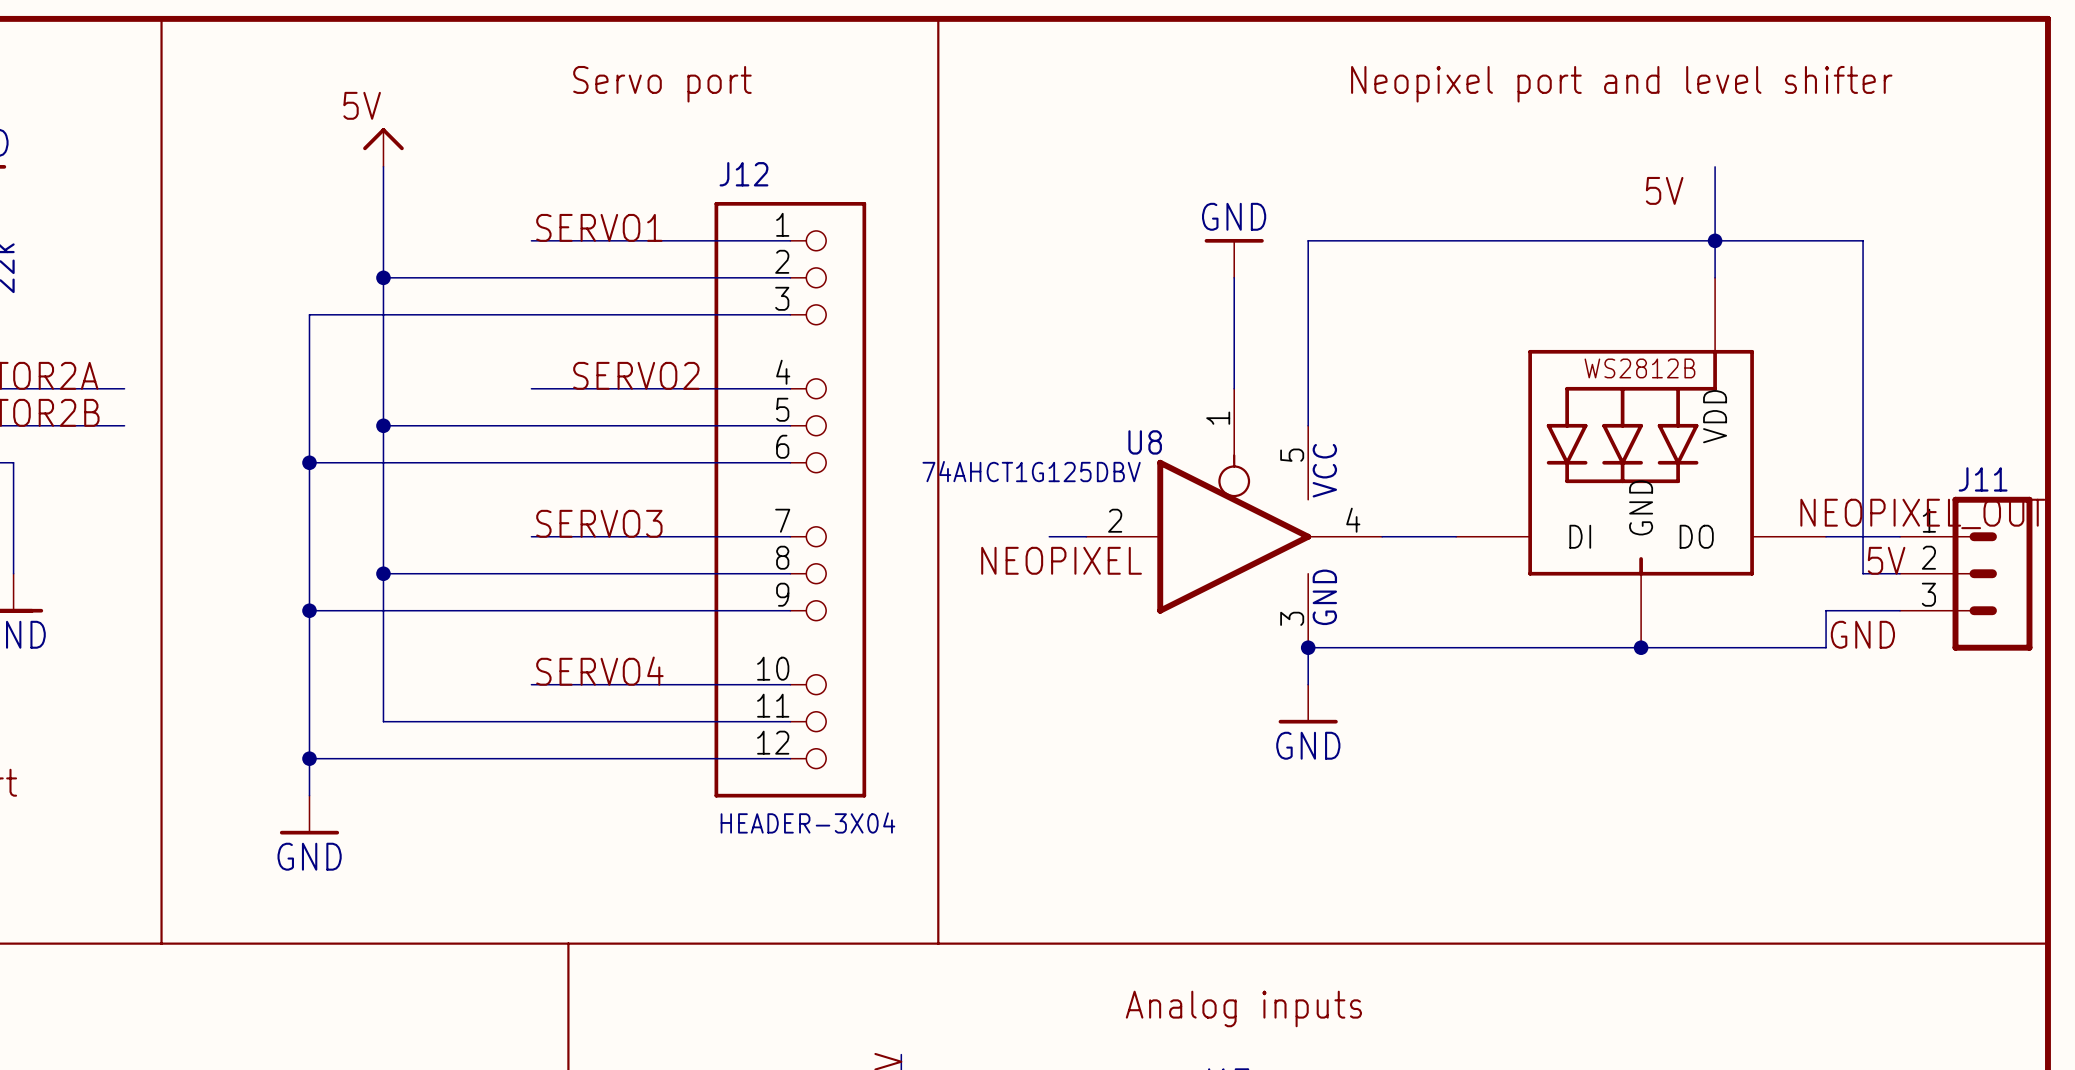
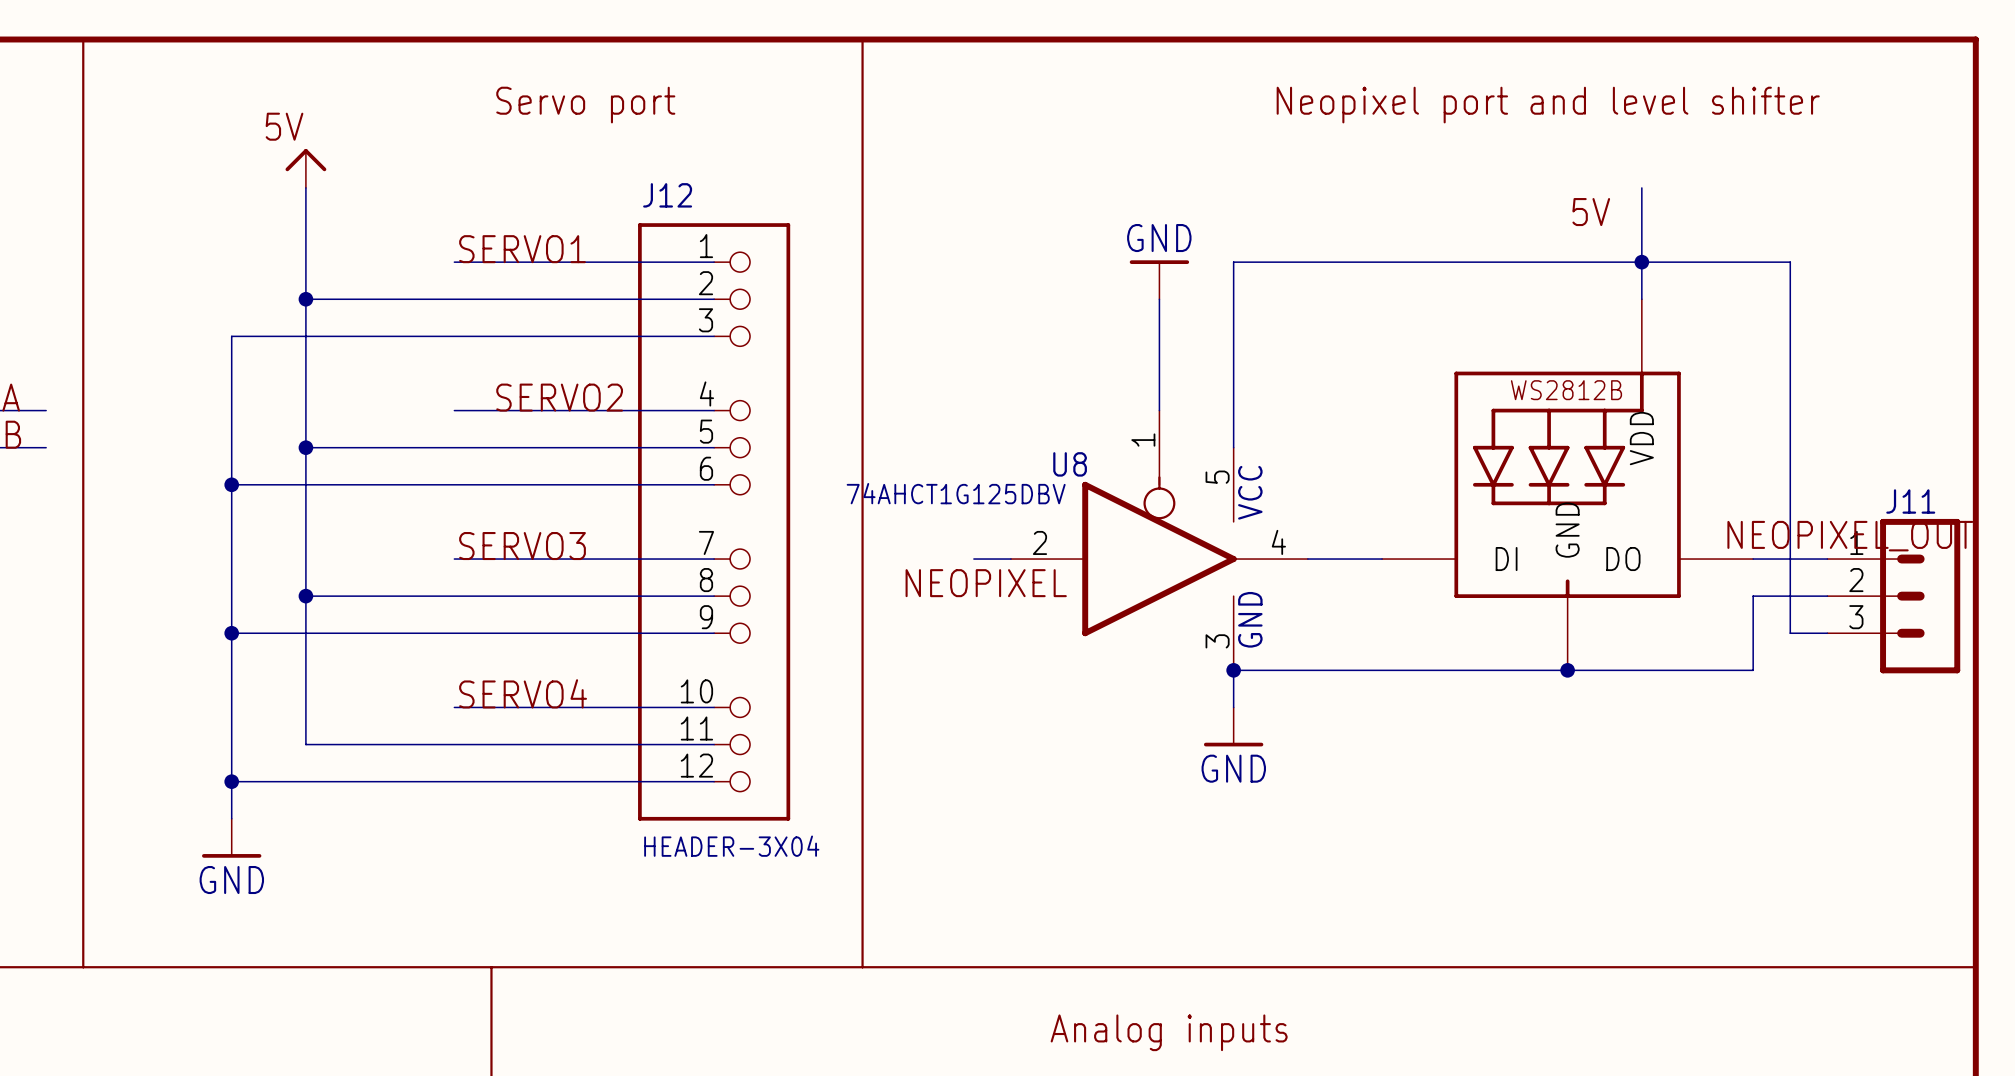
label: 5V (1886, 560) -> none
wire: (1826, 610) (1863, 610) -> (1753, 633) (1753, 596) (1790, 596) (1790, 633)
label: GND (1862, 634) -> none

